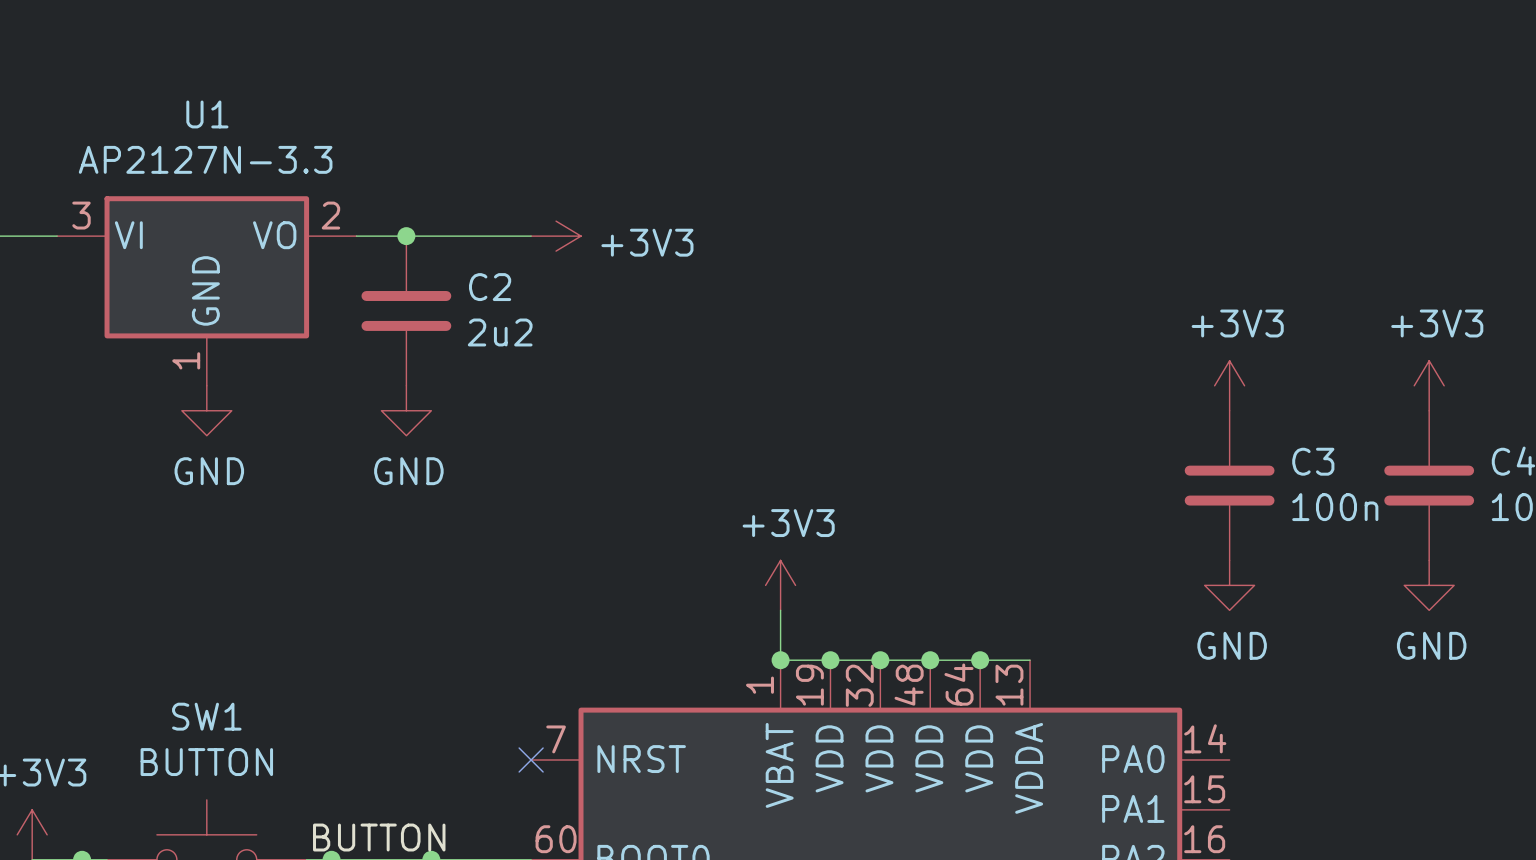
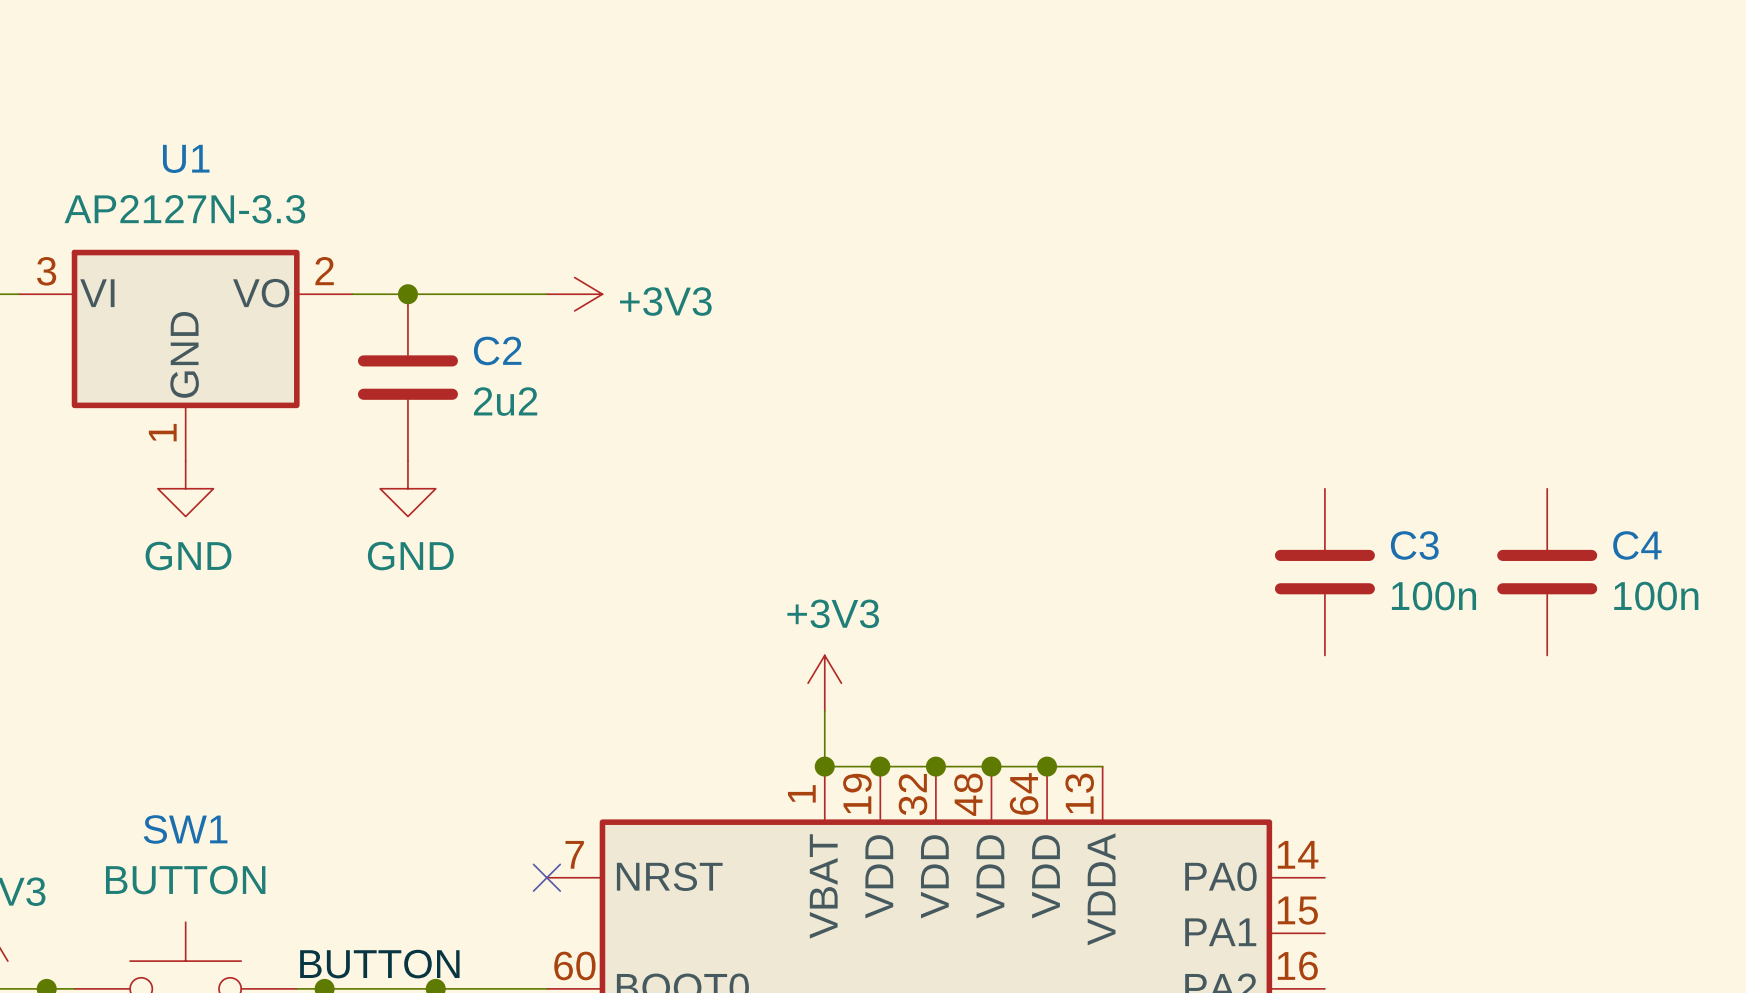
power symbol: +3V3 (1229, 385) -> none
power symbol: +3V3 (1429, 385) -> none
power symbol: GND (1229, 585) -> none
power symbol: GND (1429, 585) -> none

